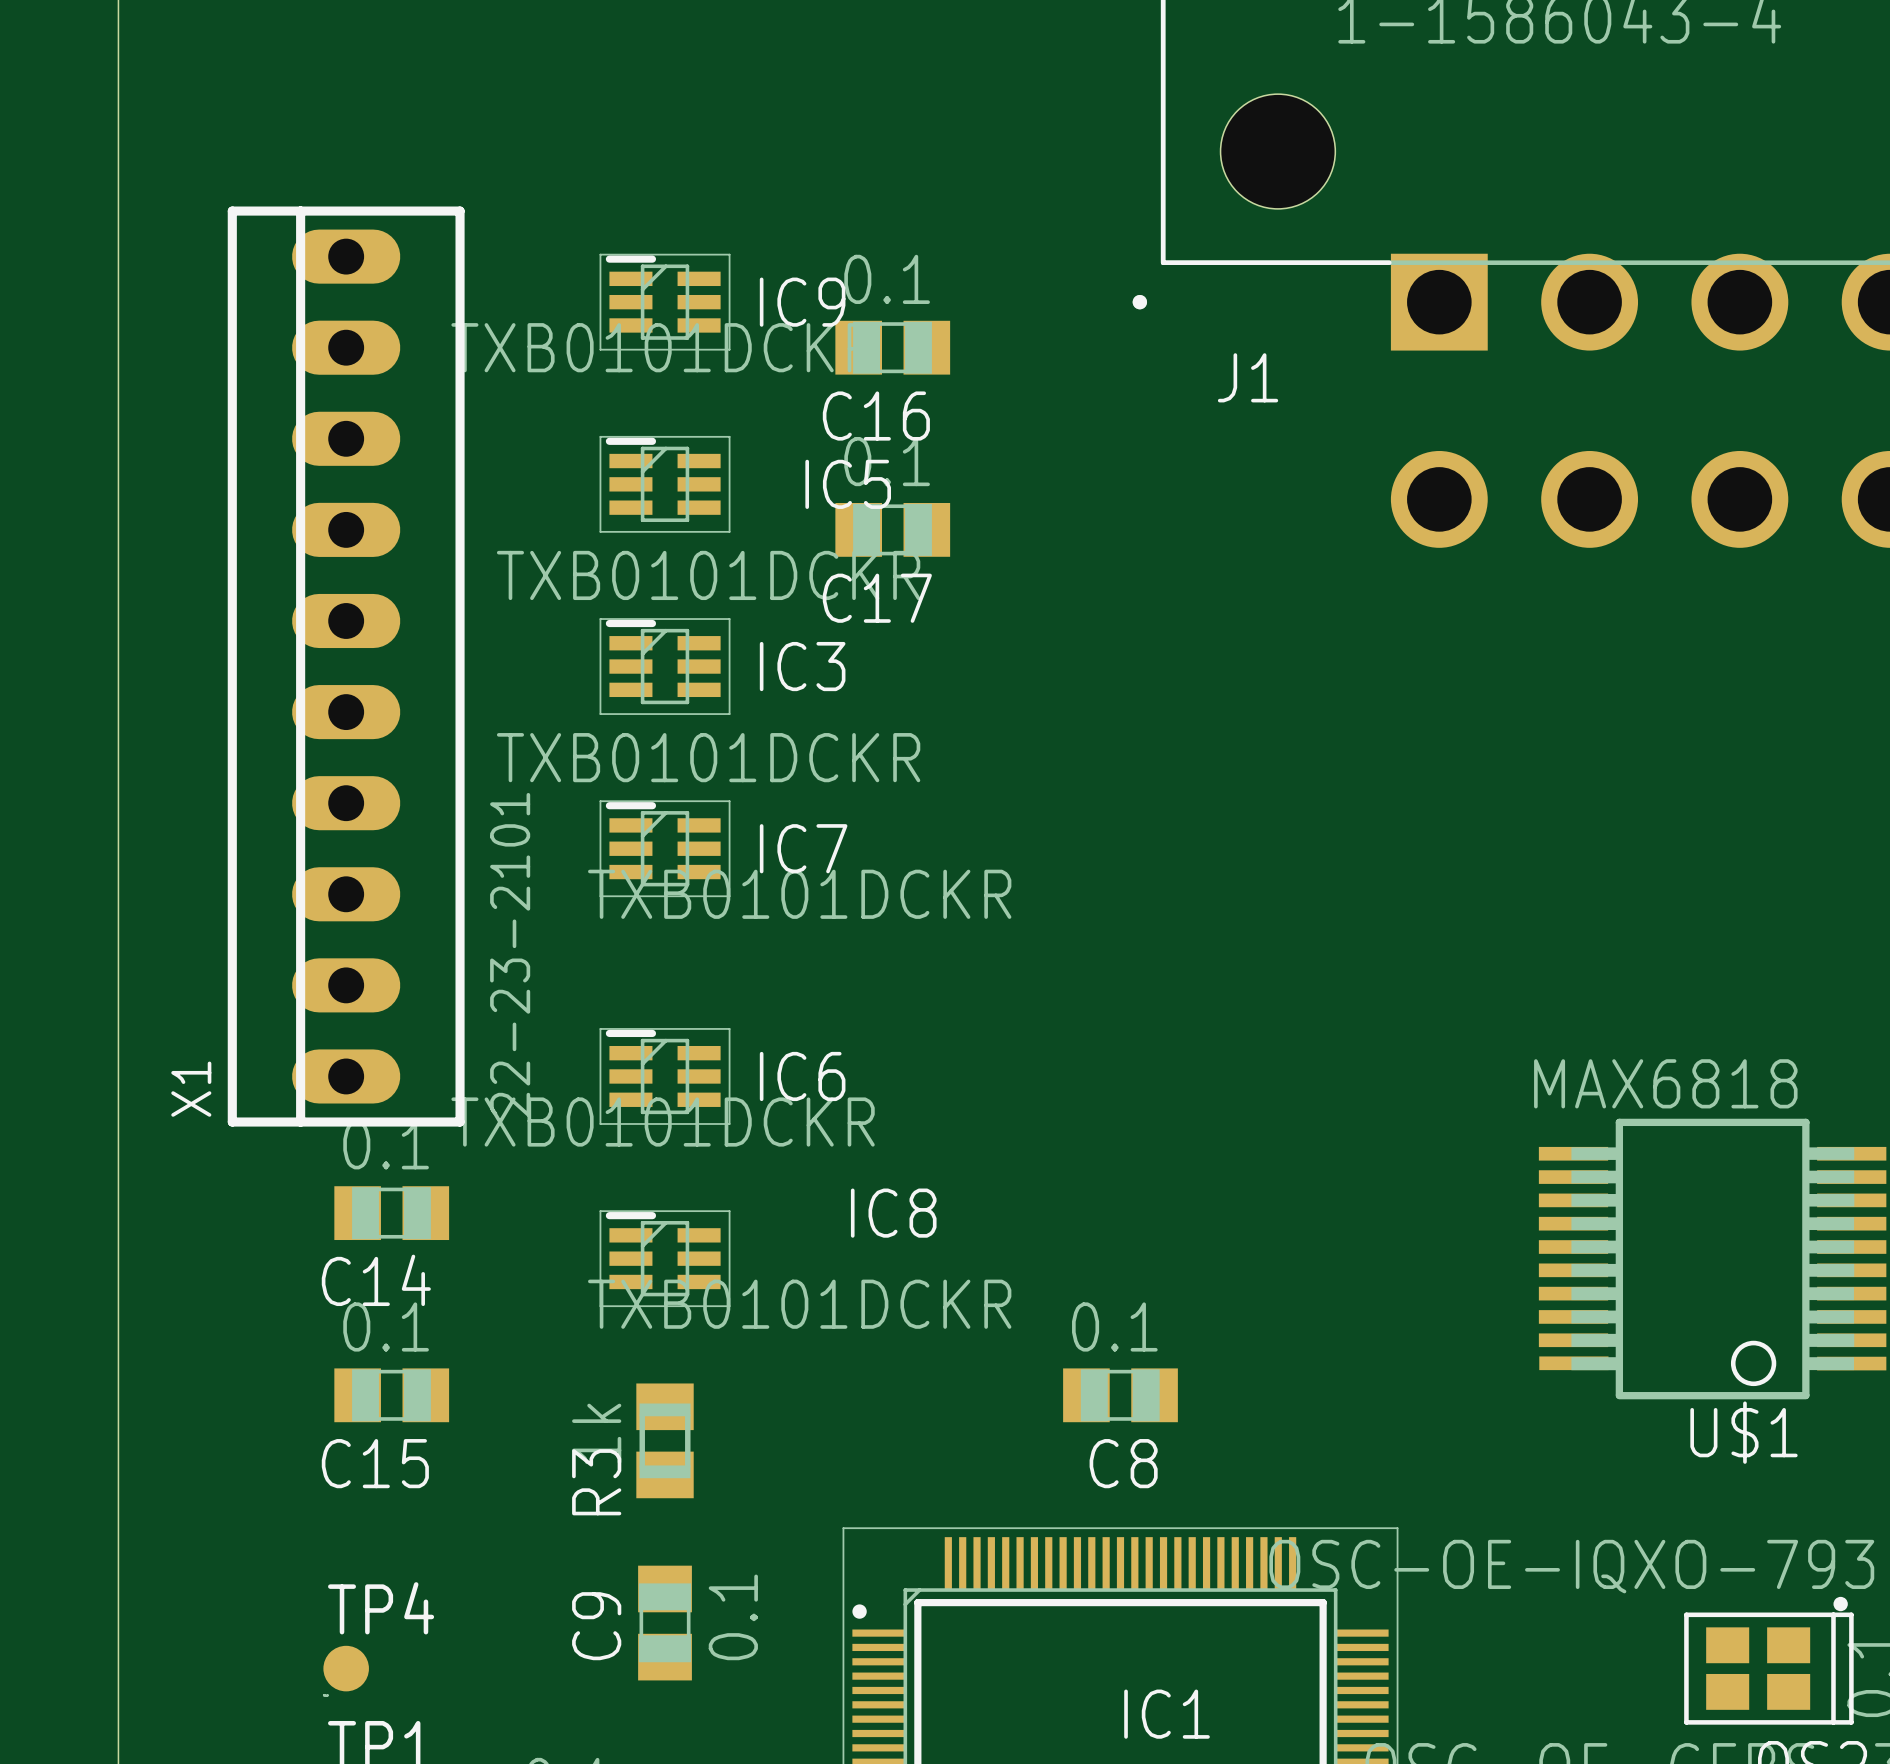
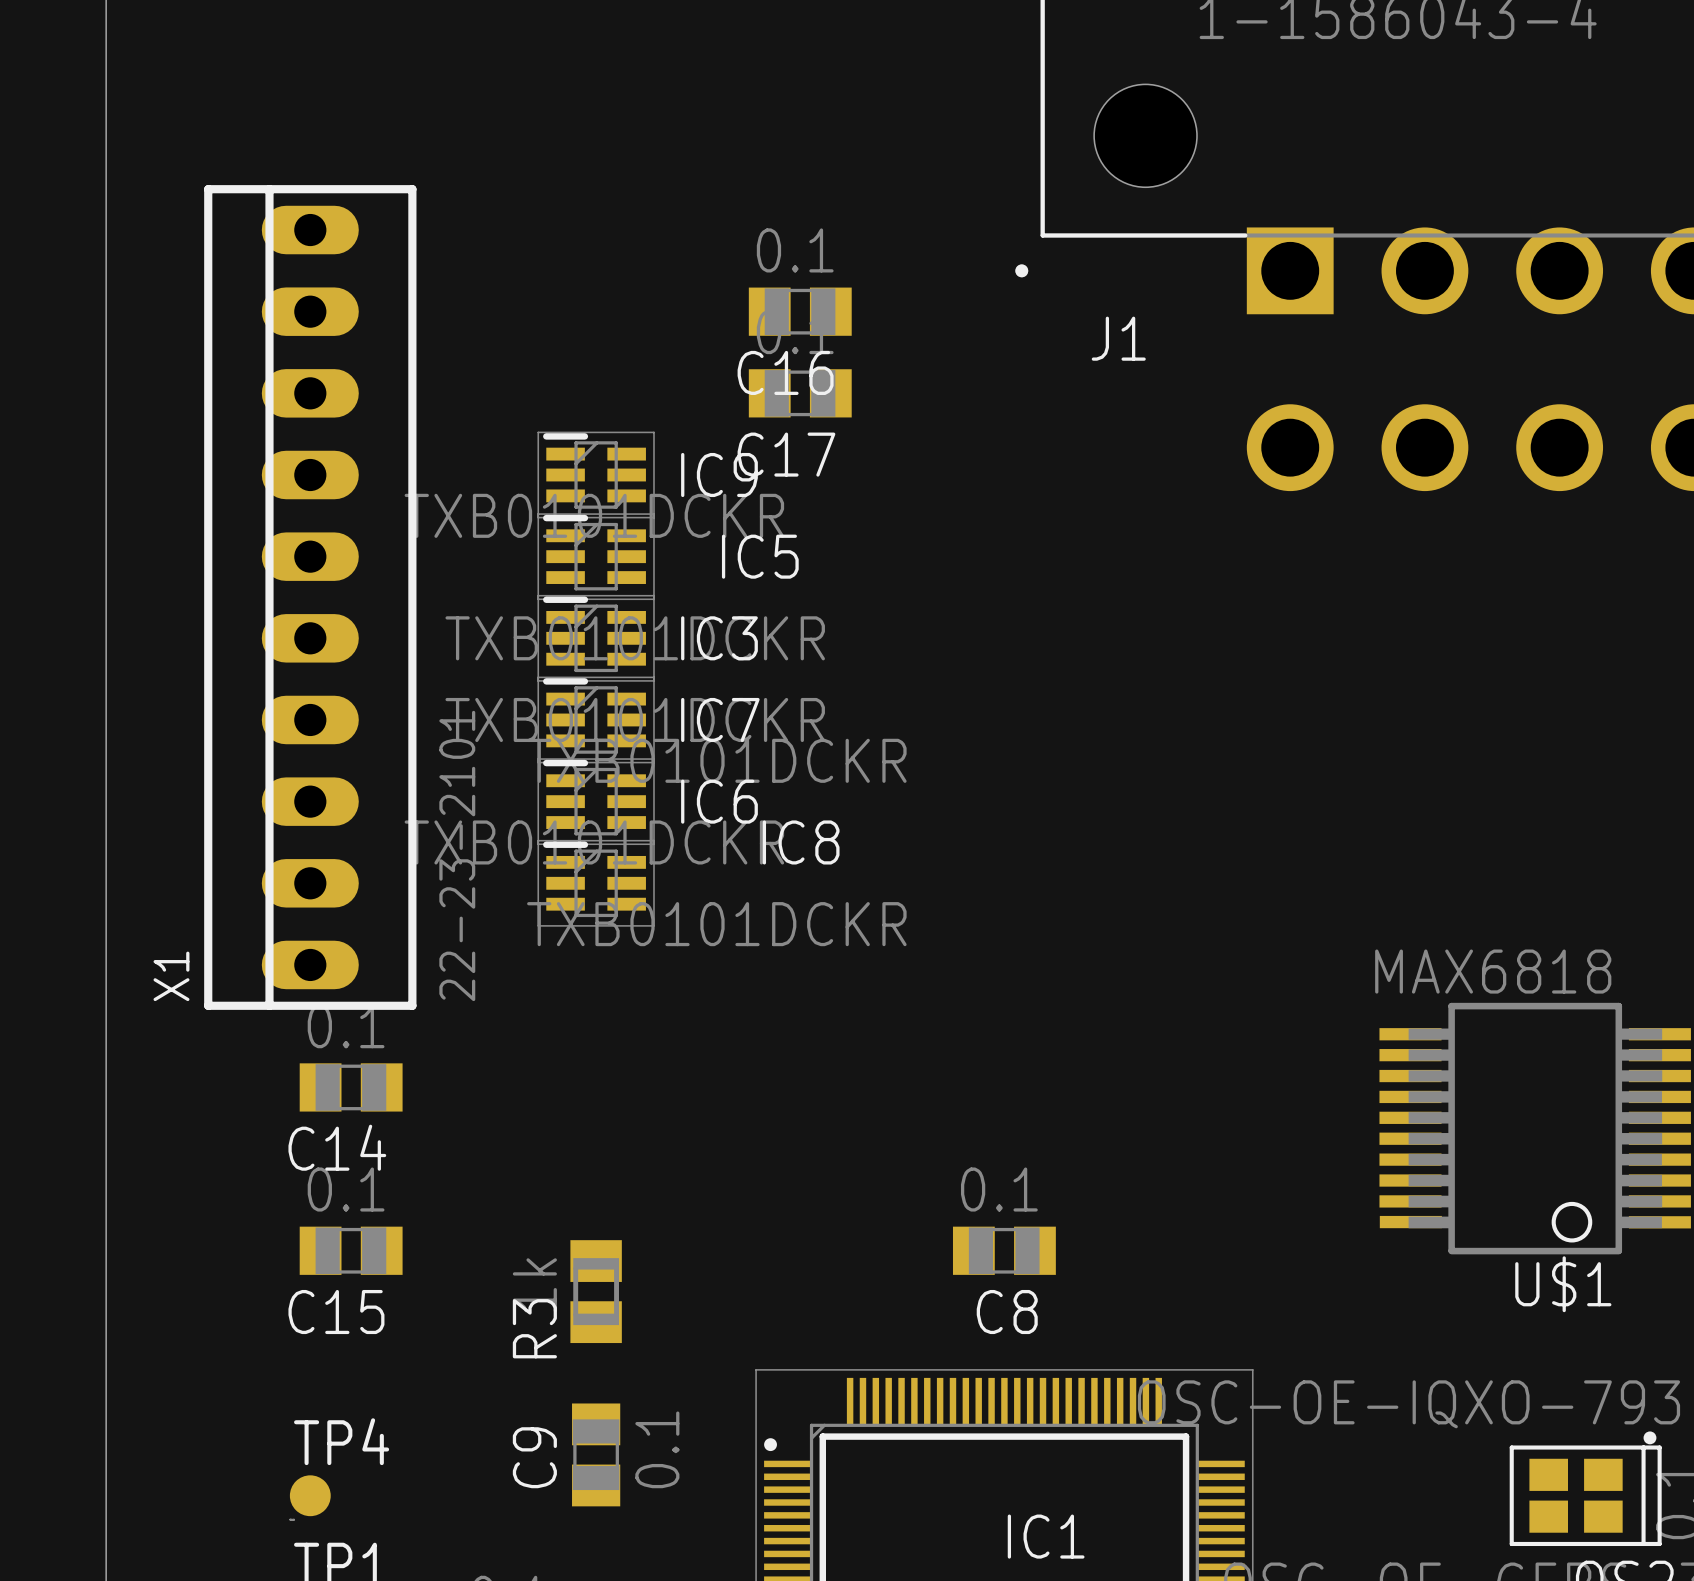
IC9 position: (665, 302) -> (596, 475)
IC5 position: (665, 484) -> (596, 556)
C17 position: (892, 529) -> (800, 393)
IC3 position: (665, 666) -> (596, 638)
IC7 position: (665, 848) -> (596, 719)
IC6 position: (665, 1076) -> (596, 801)
IC8 position: (665, 1258) -> (596, 883)

